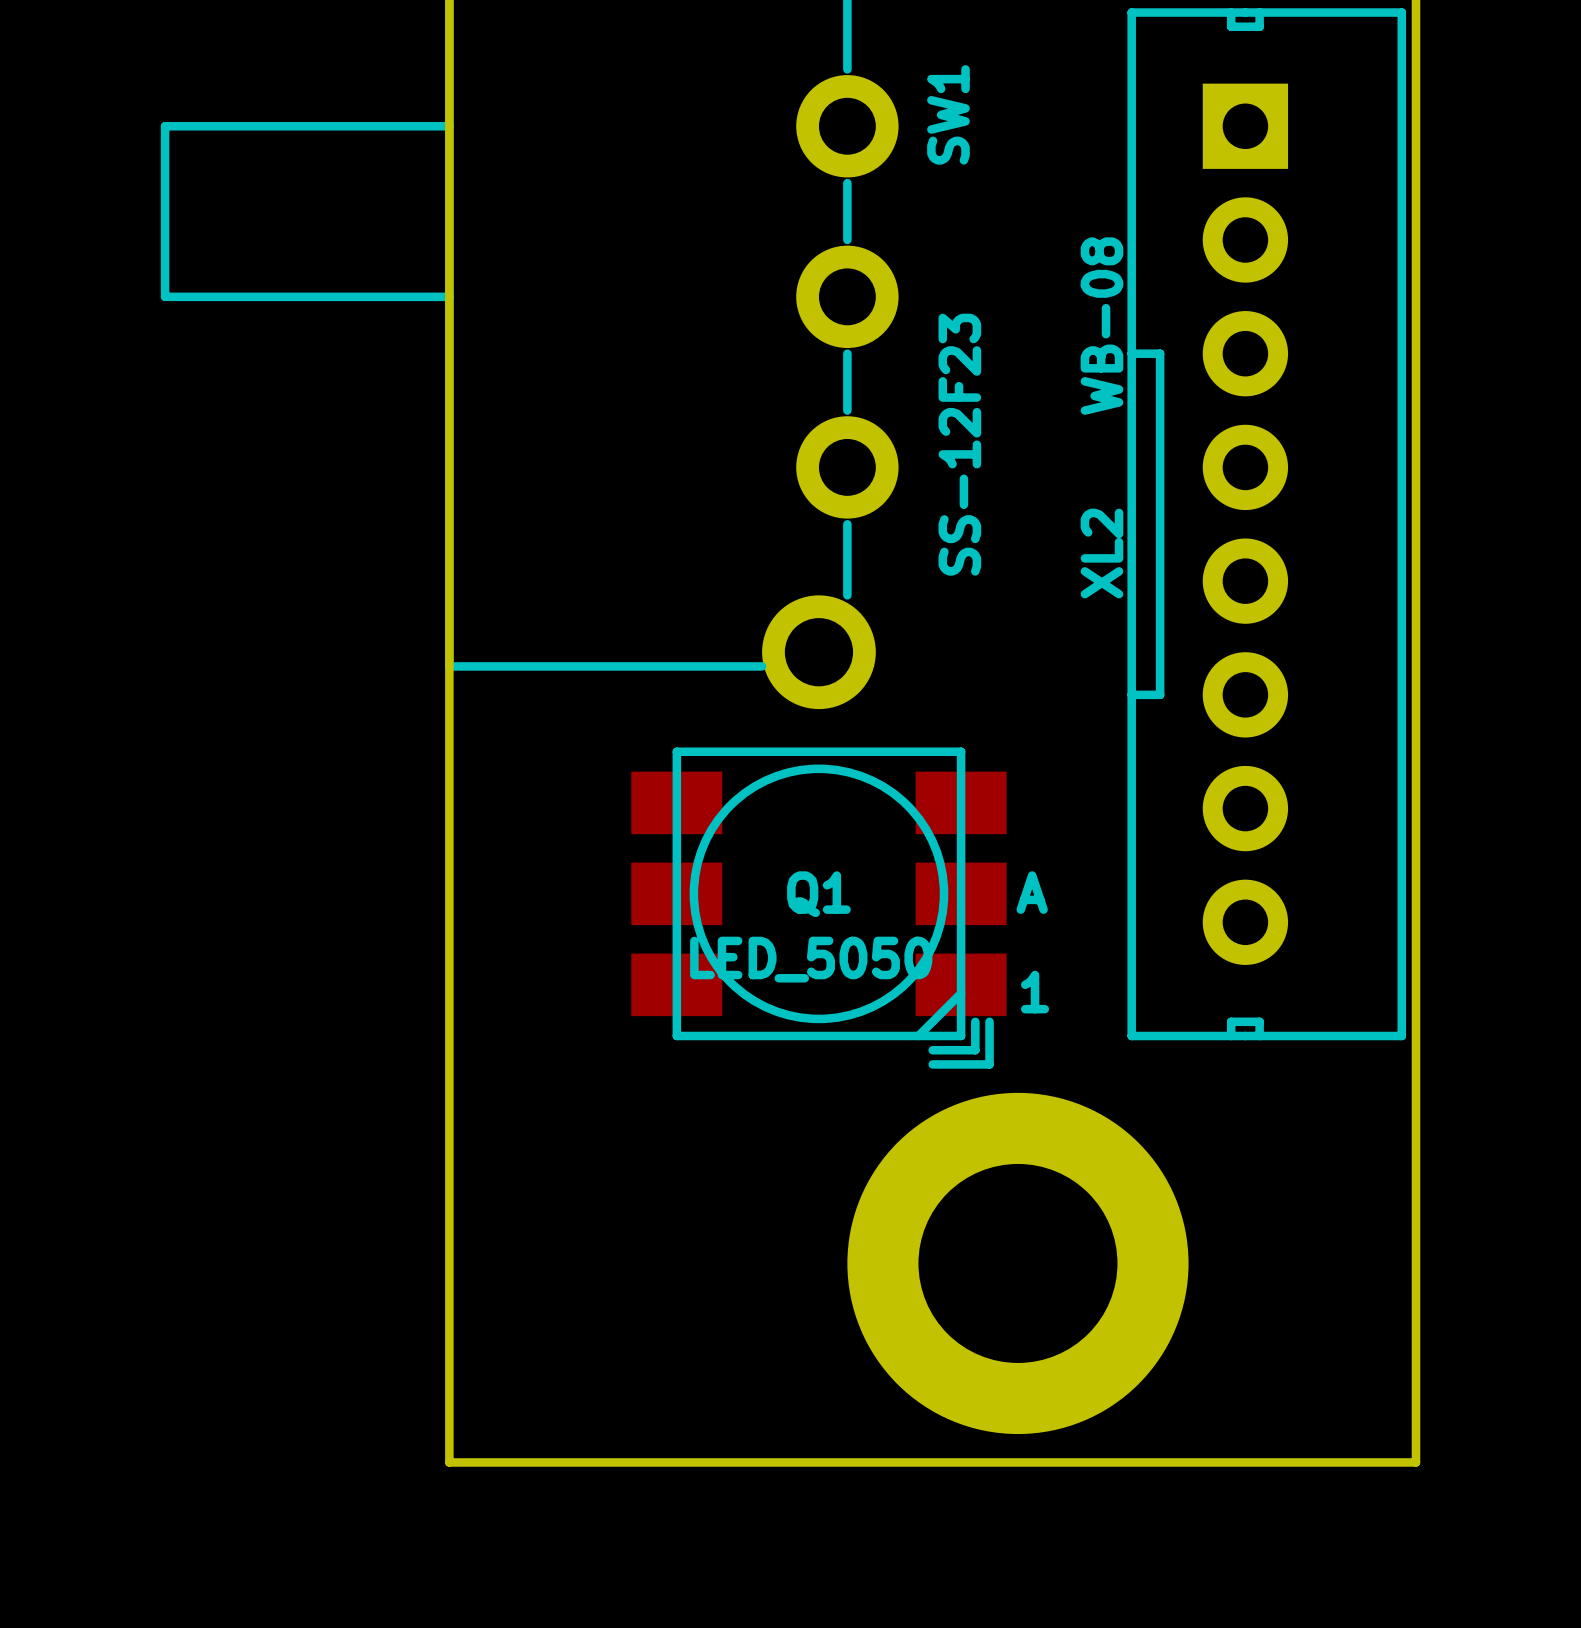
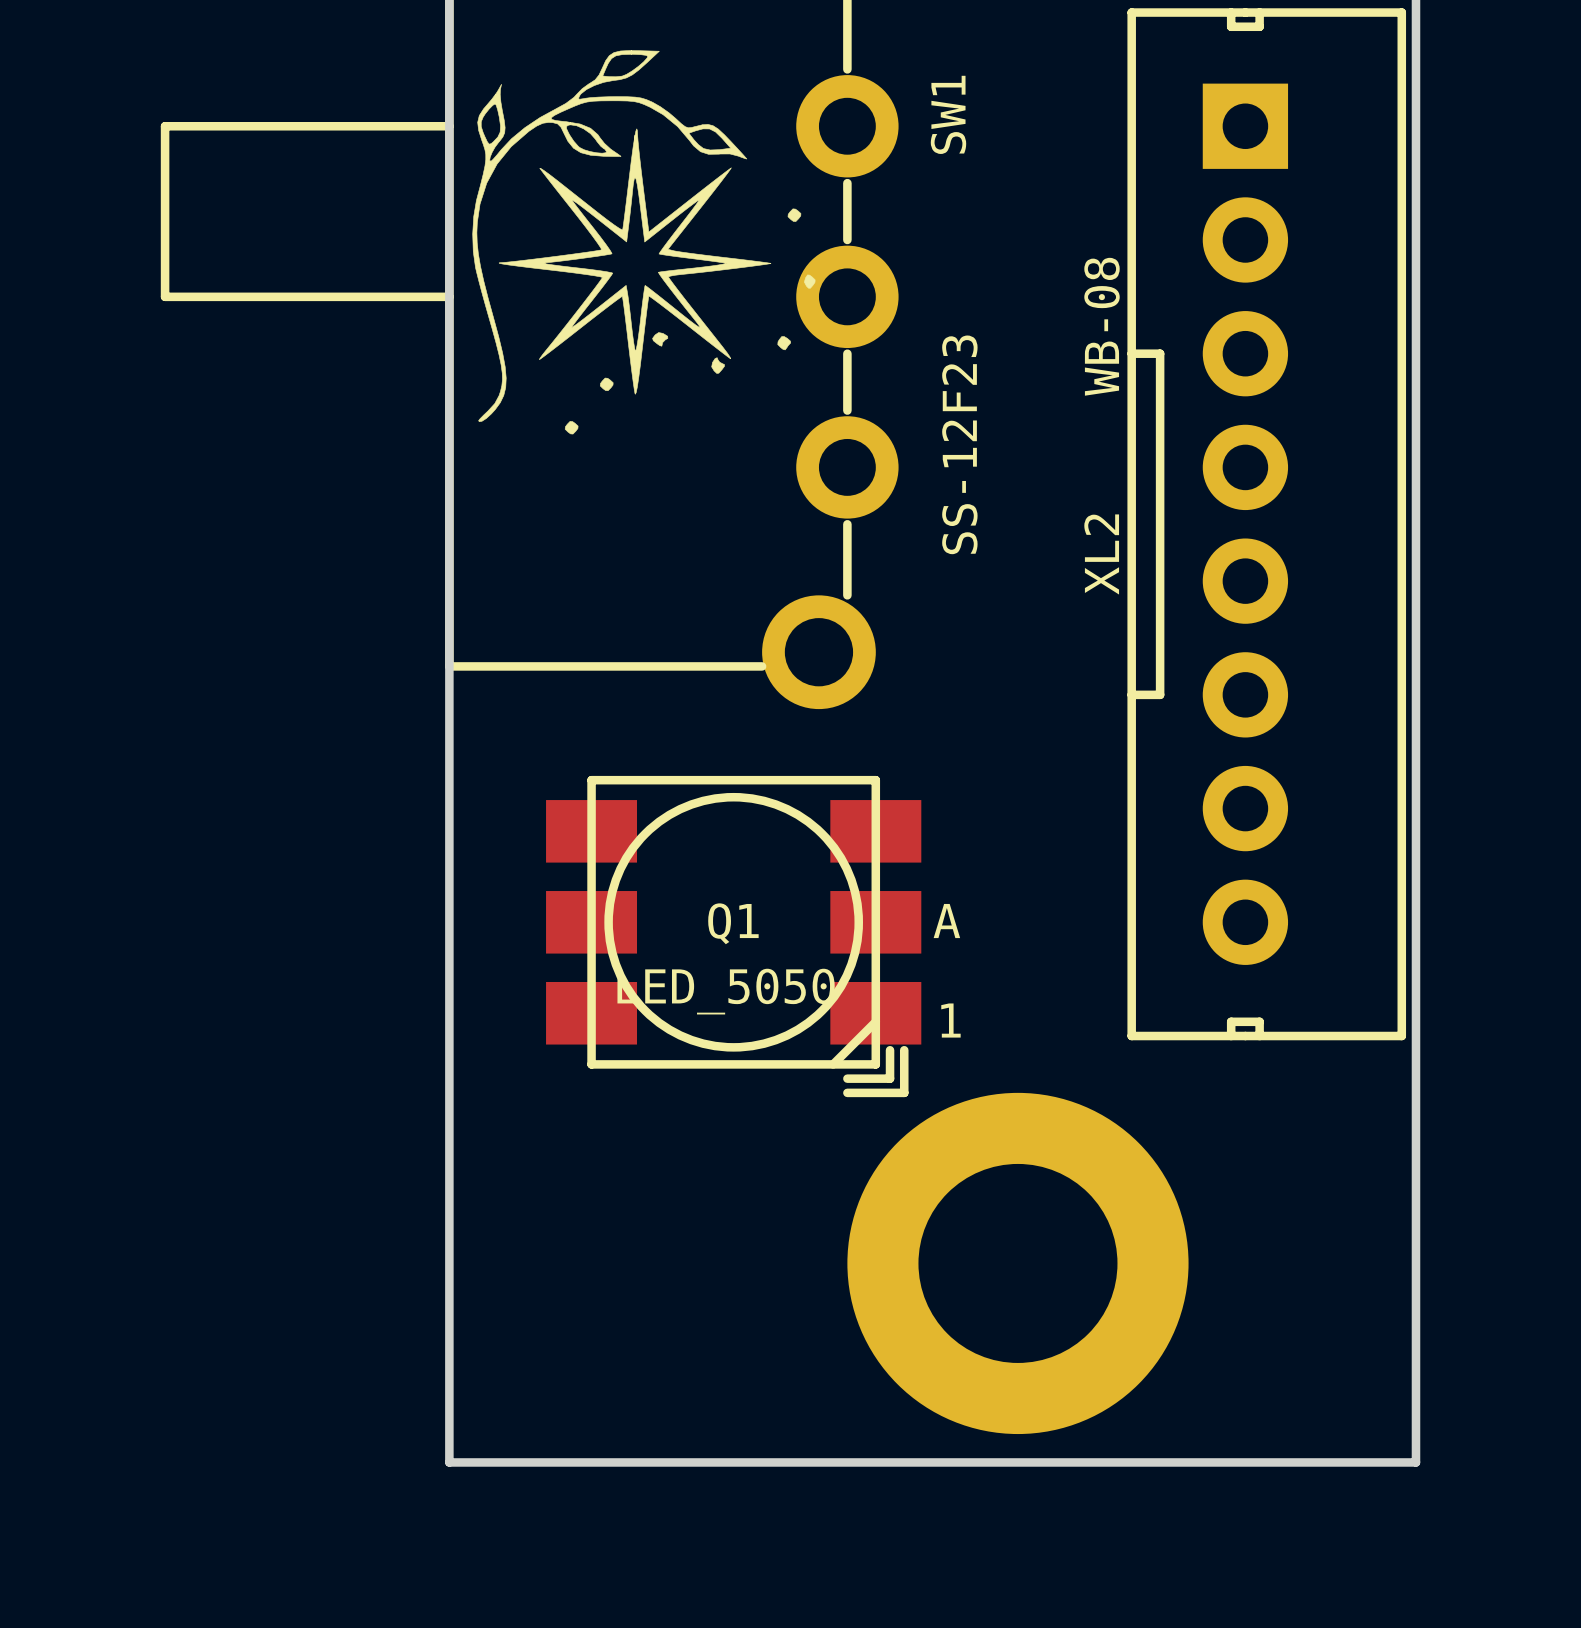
drawing: none -> [472, 50, 816, 435]
Q1 position: (818, 908) -> (733, 936)

